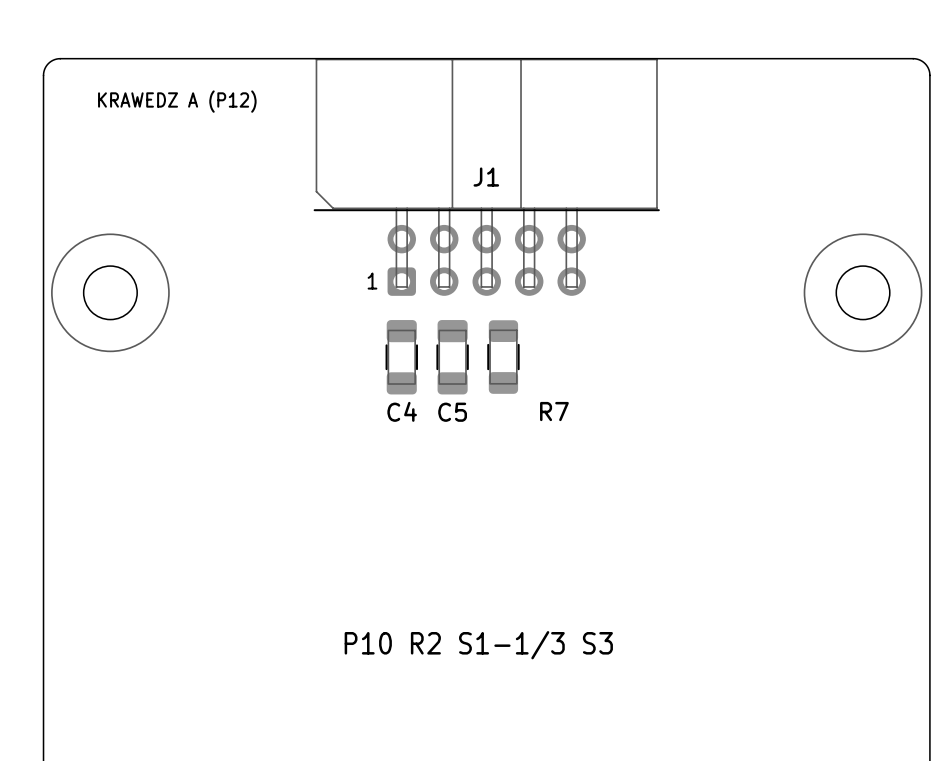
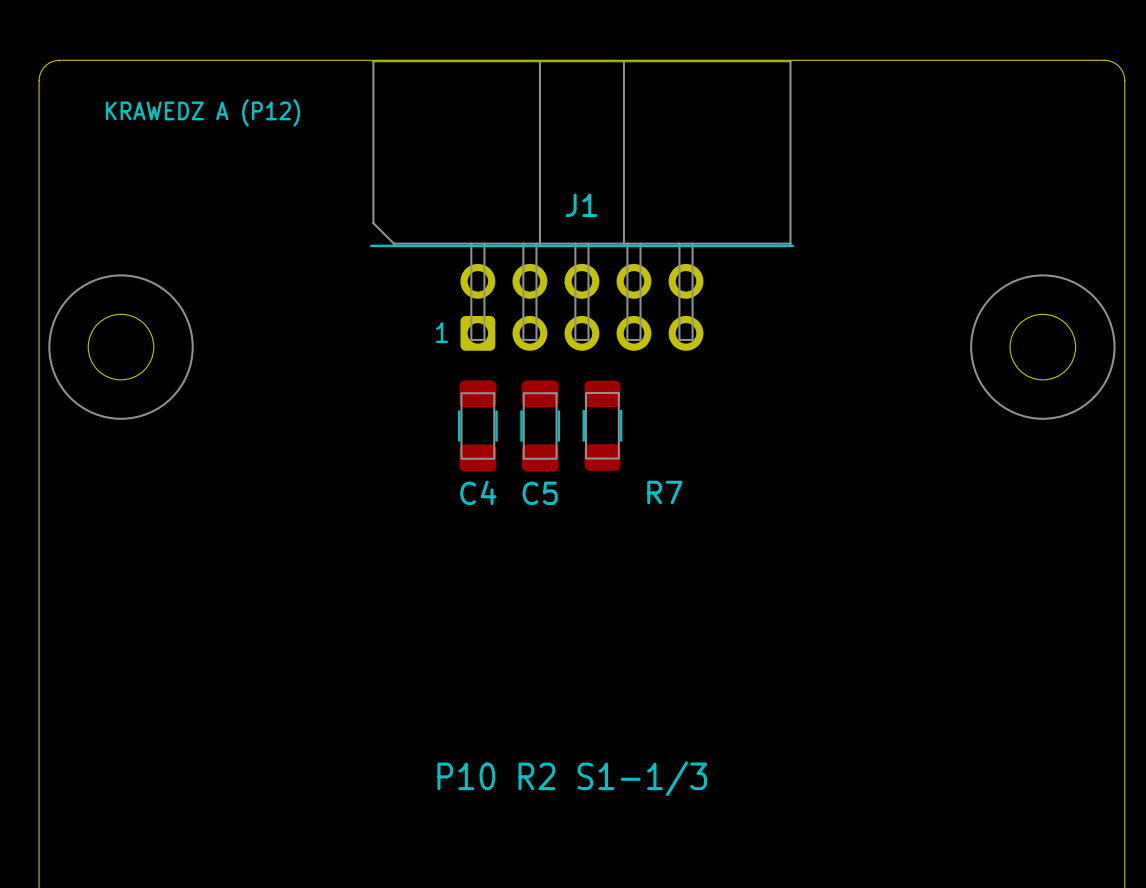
text: P10 R2 S1-1/3 S3 (478, 645) -> P10 R2 S1-1/3 (572, 778)

